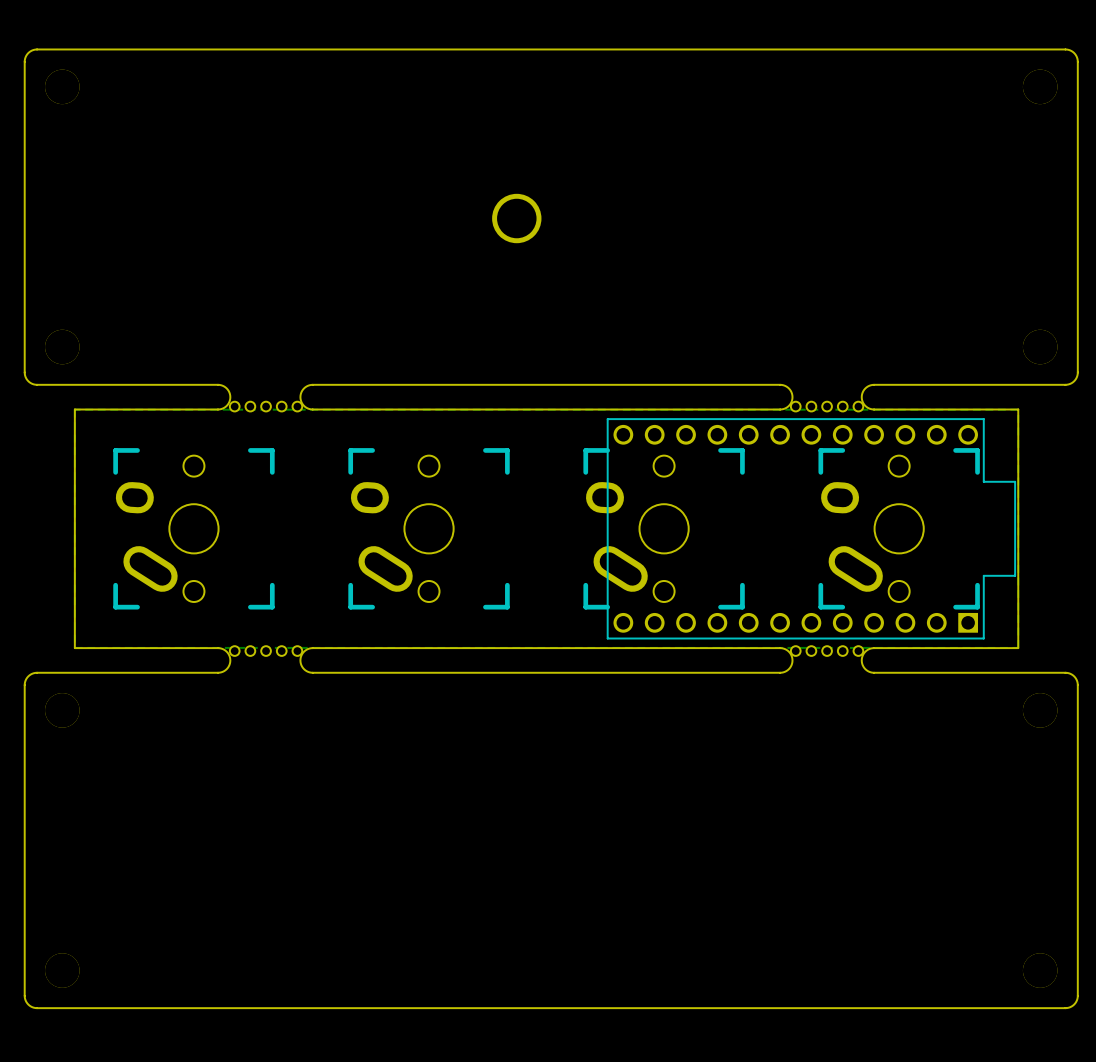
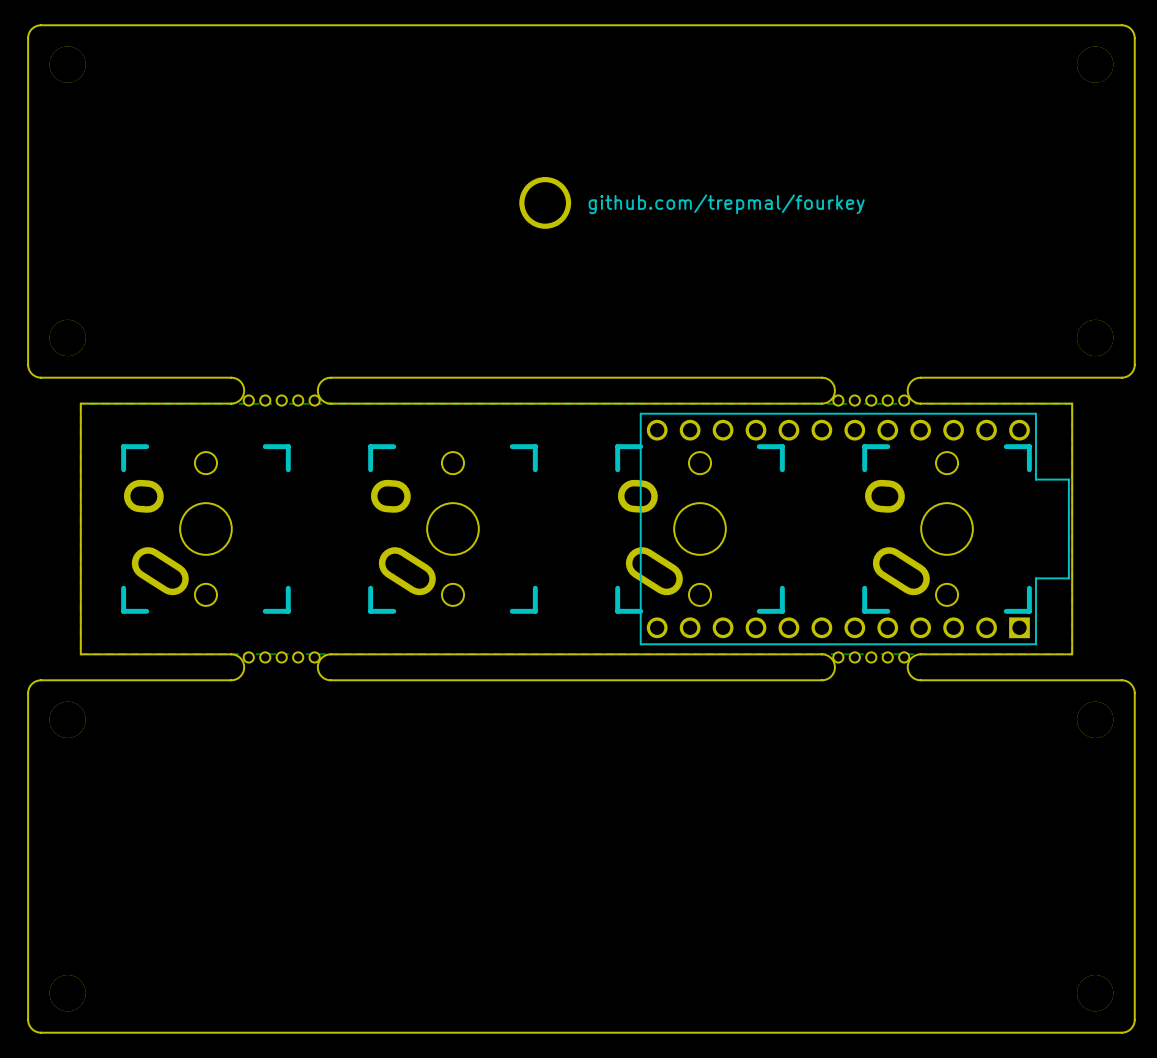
text: none -> github.com/trepmal/fourkey (726, 204)

